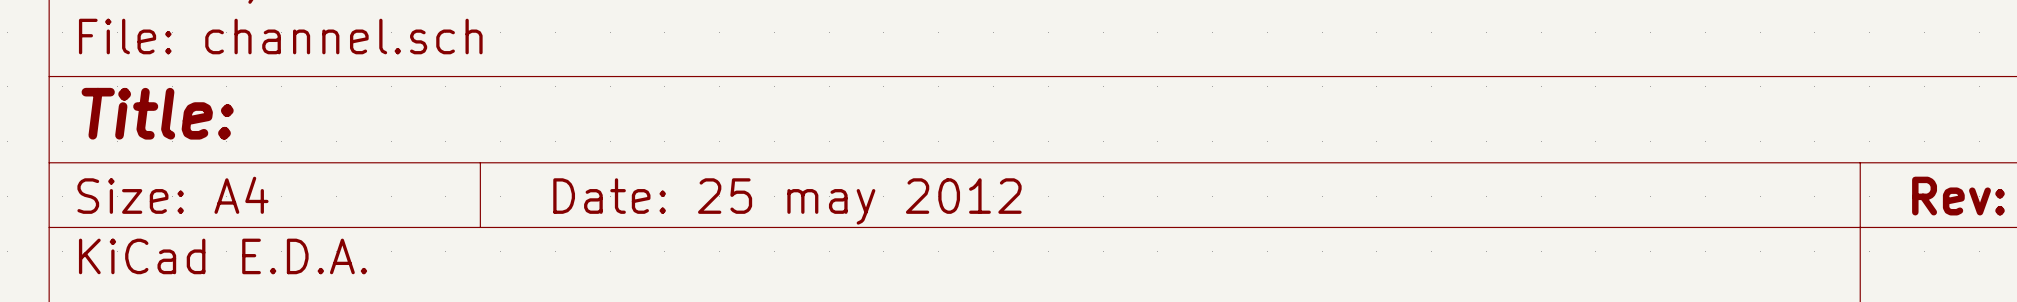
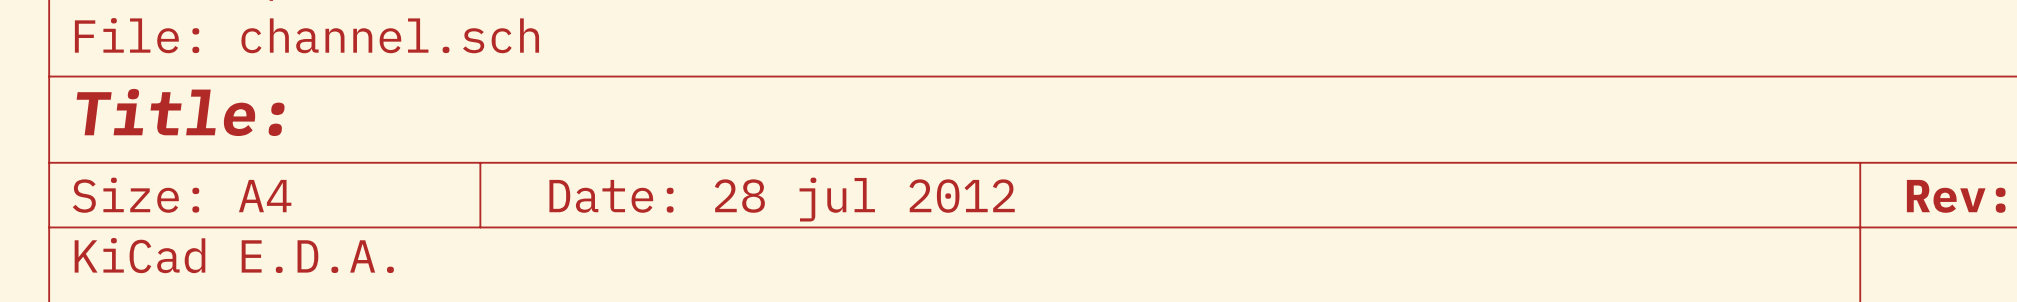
title block: Date: 25 may 2012 (787, 201) -> Date: 28 jul 2012 (782, 199)

